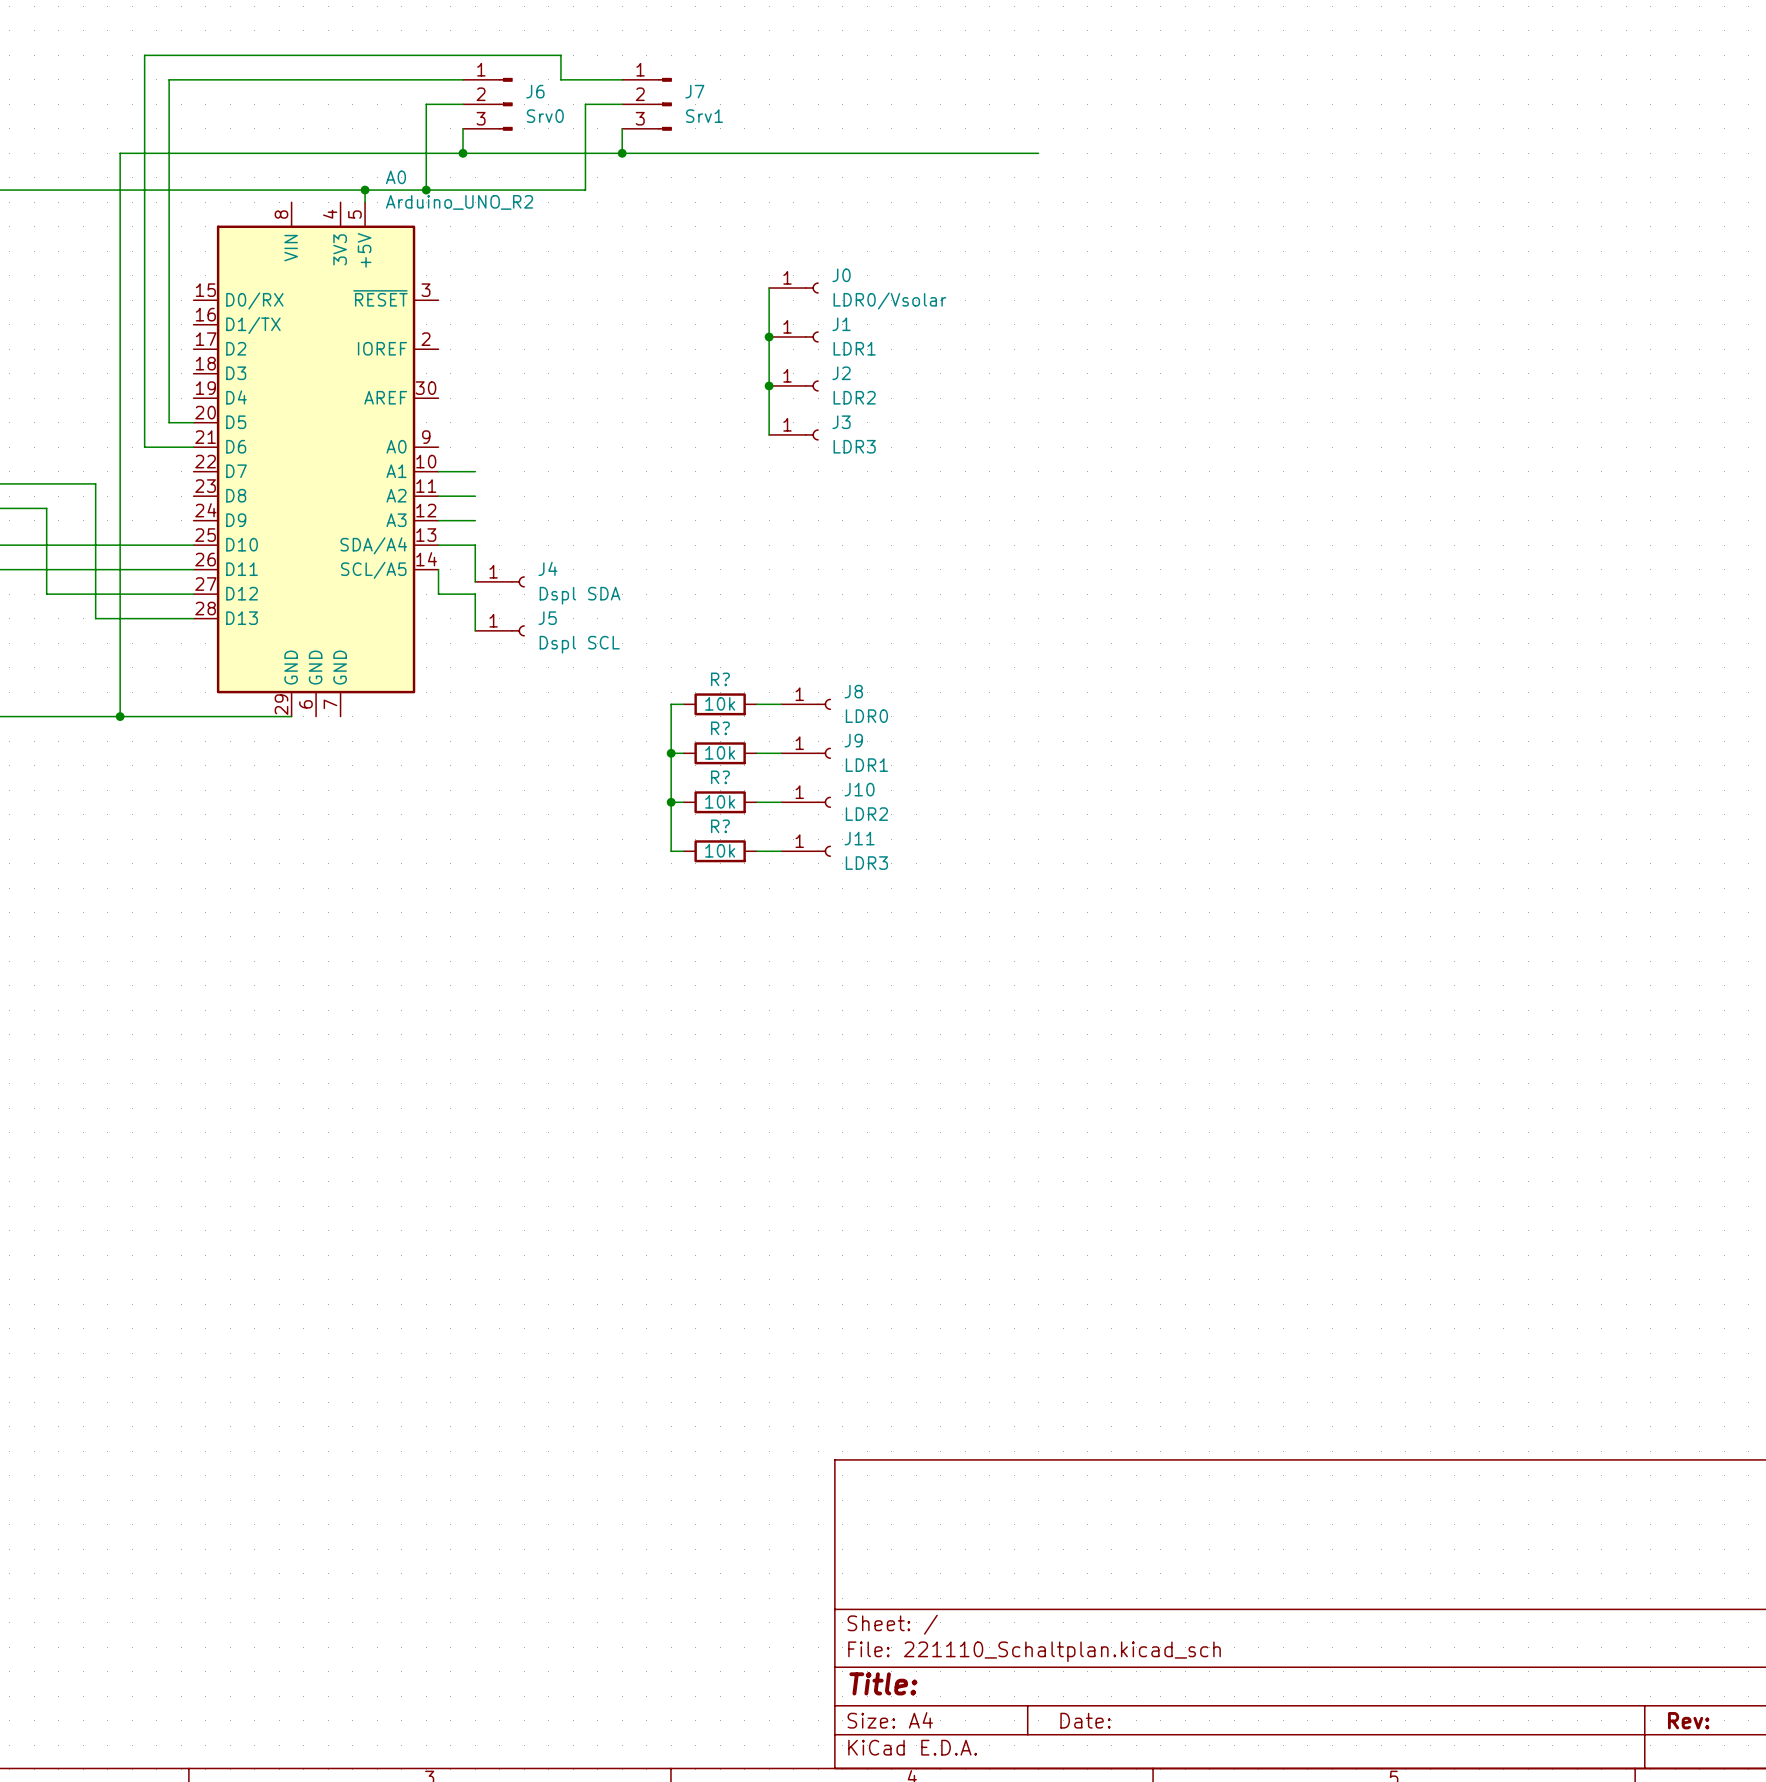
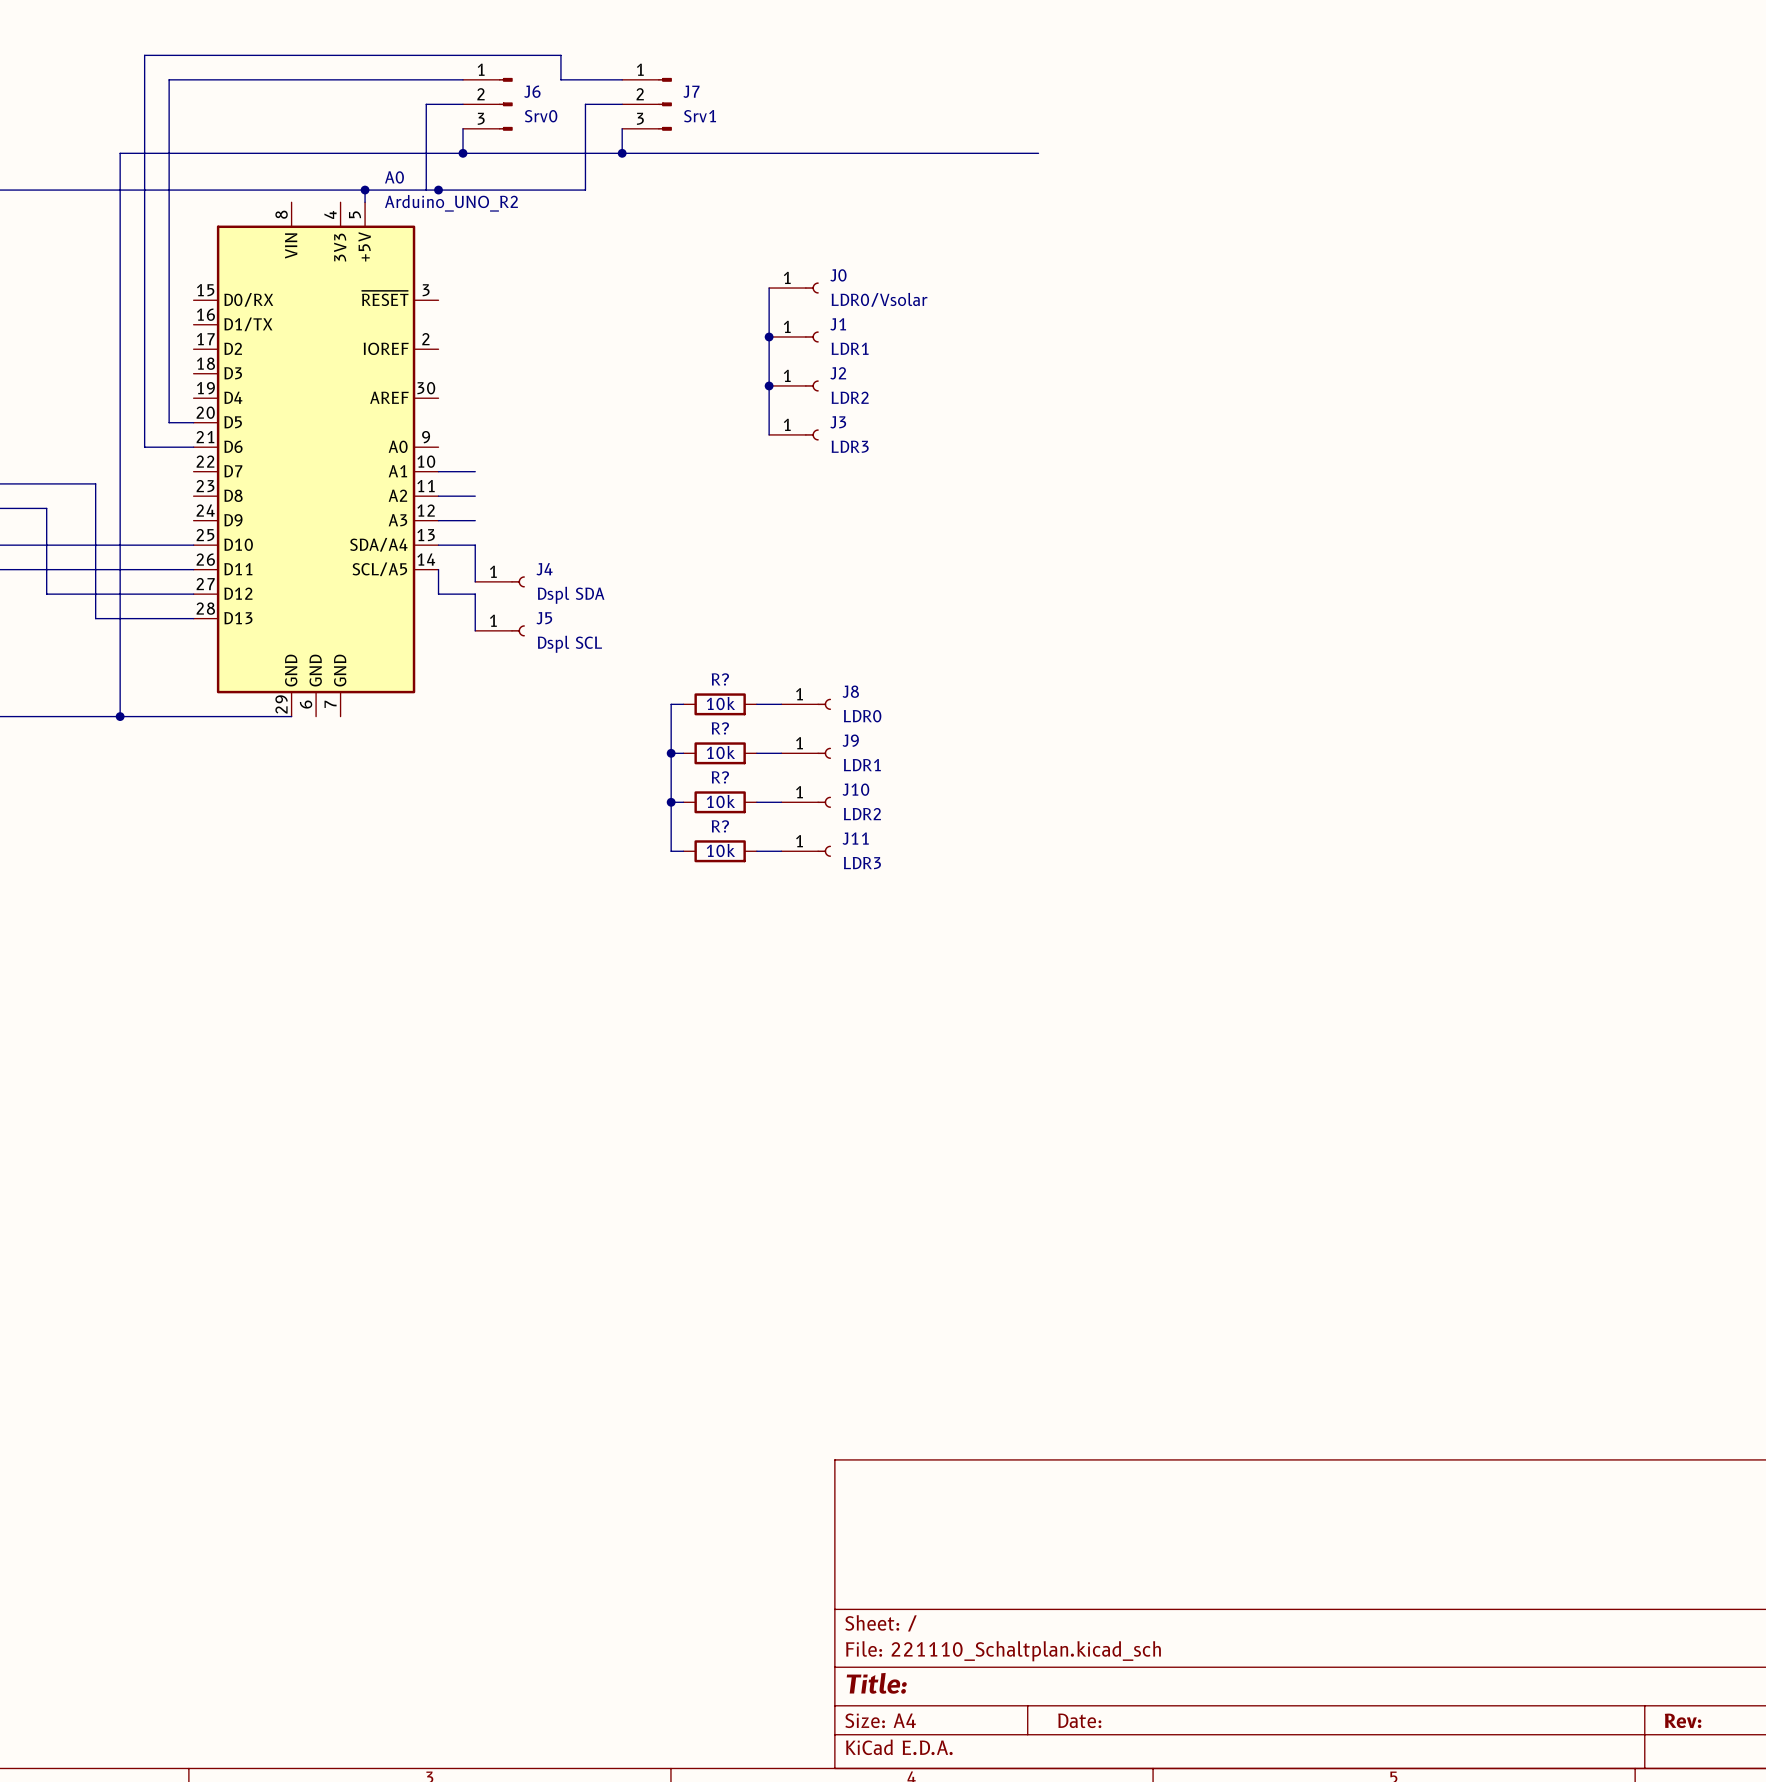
junction position: (426, 190) -> (438, 190)

